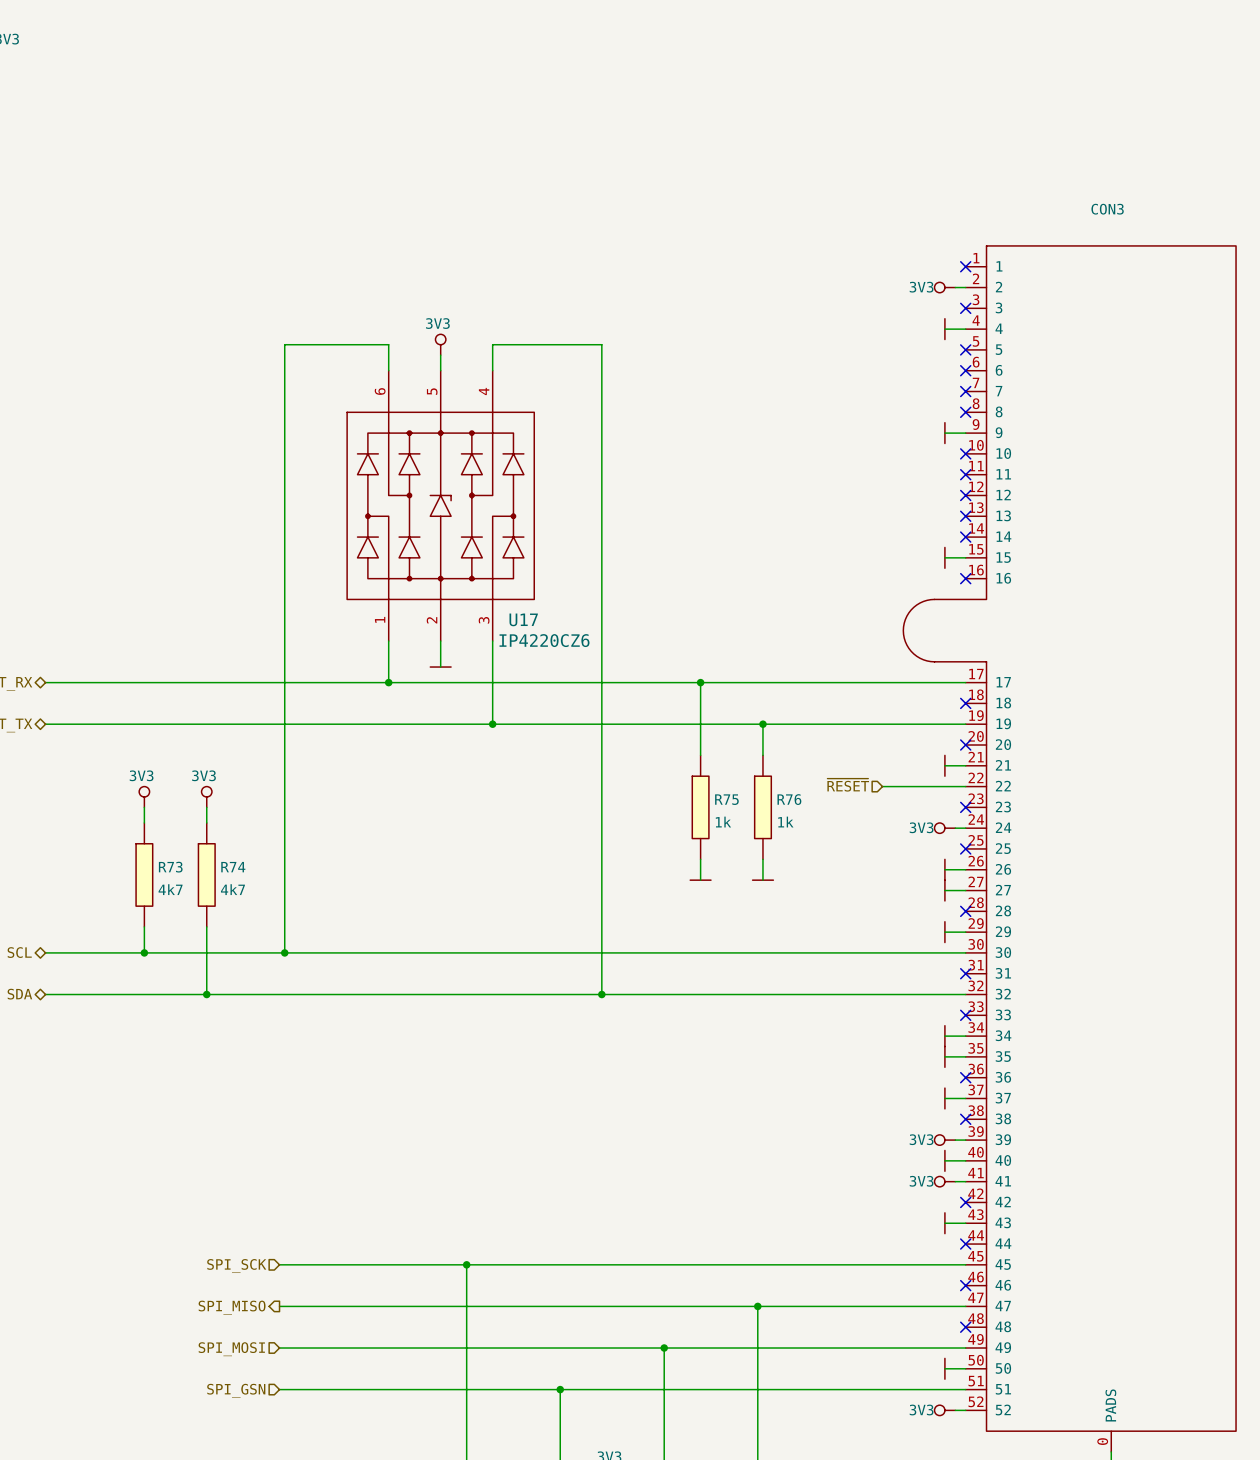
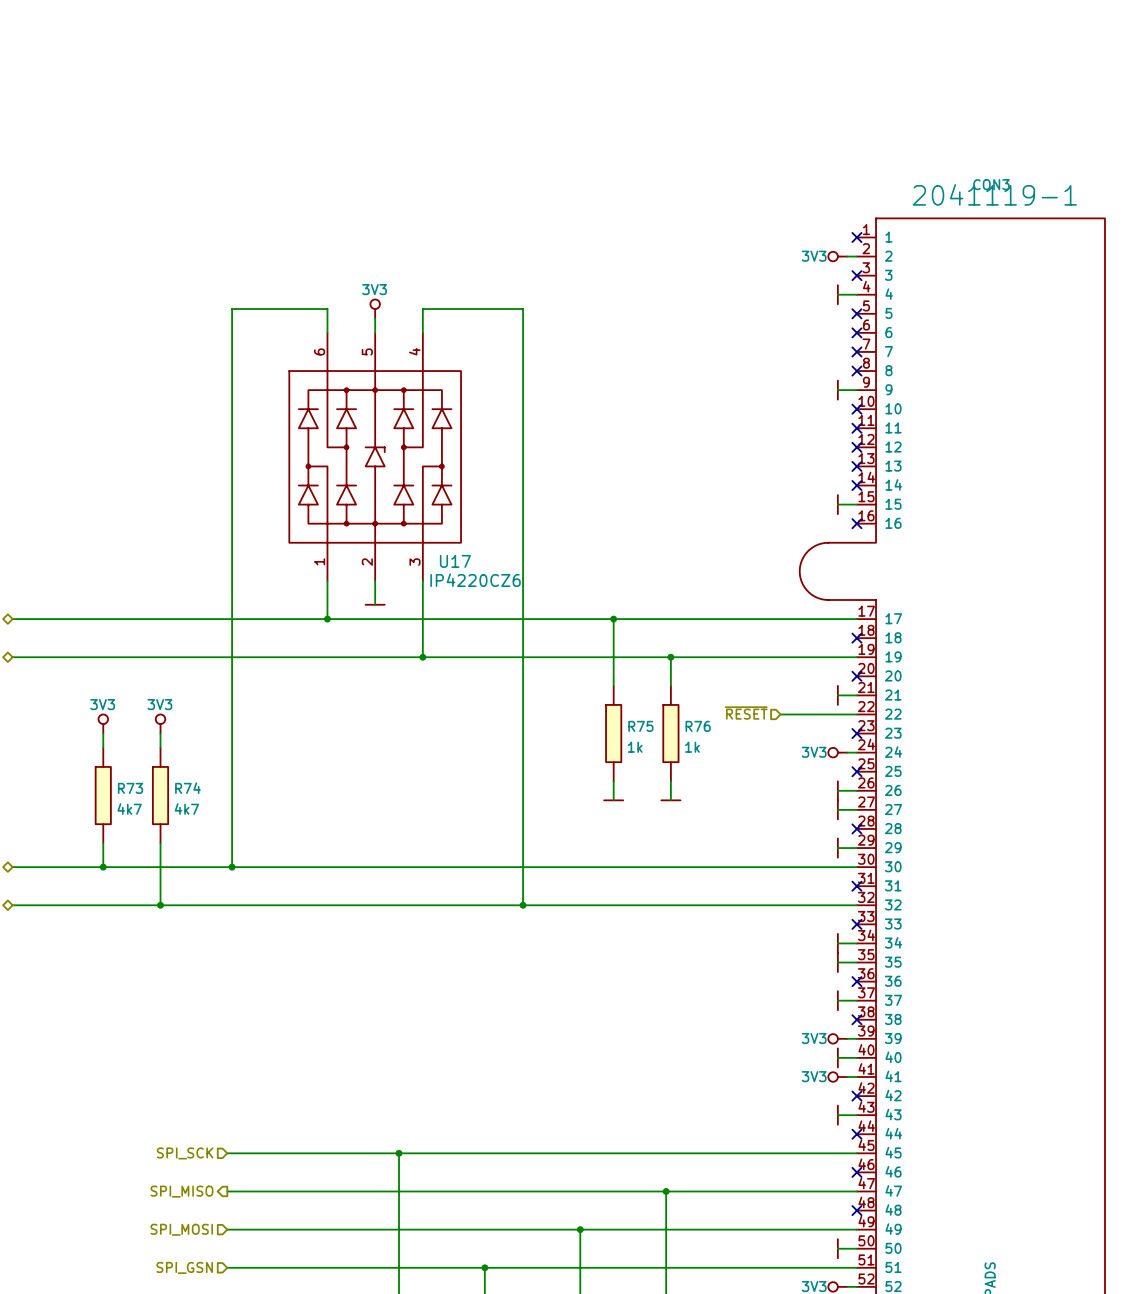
CON3 value: none -> 2041119-1 (994, 194)

